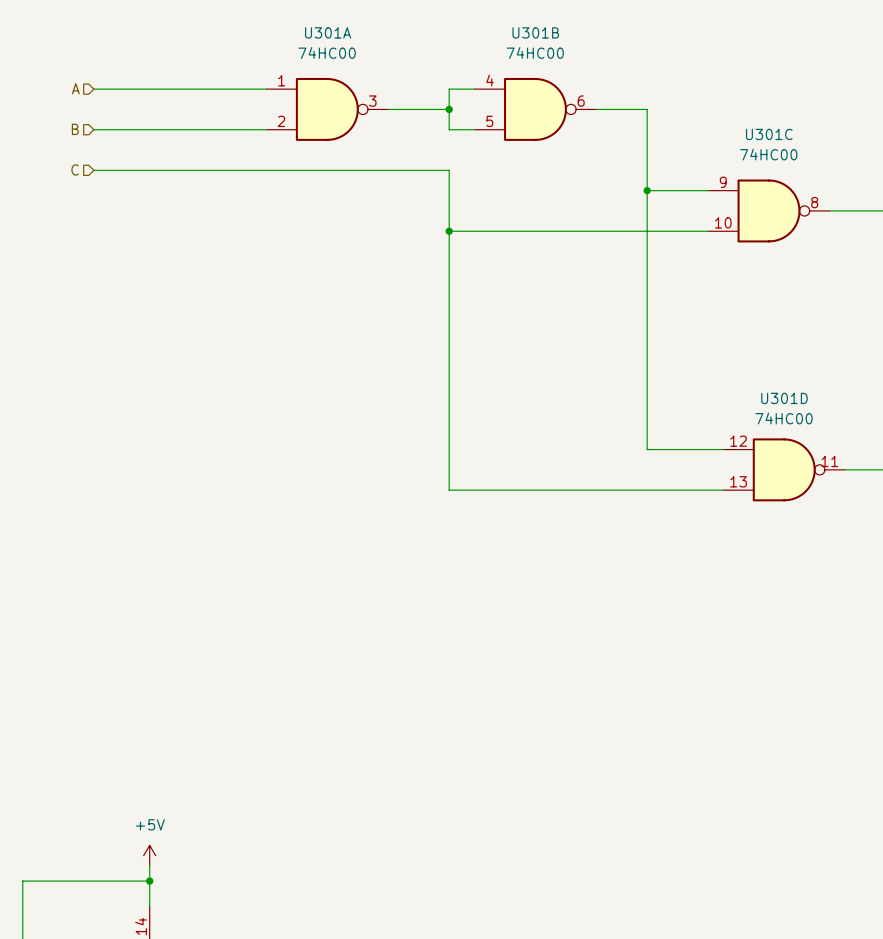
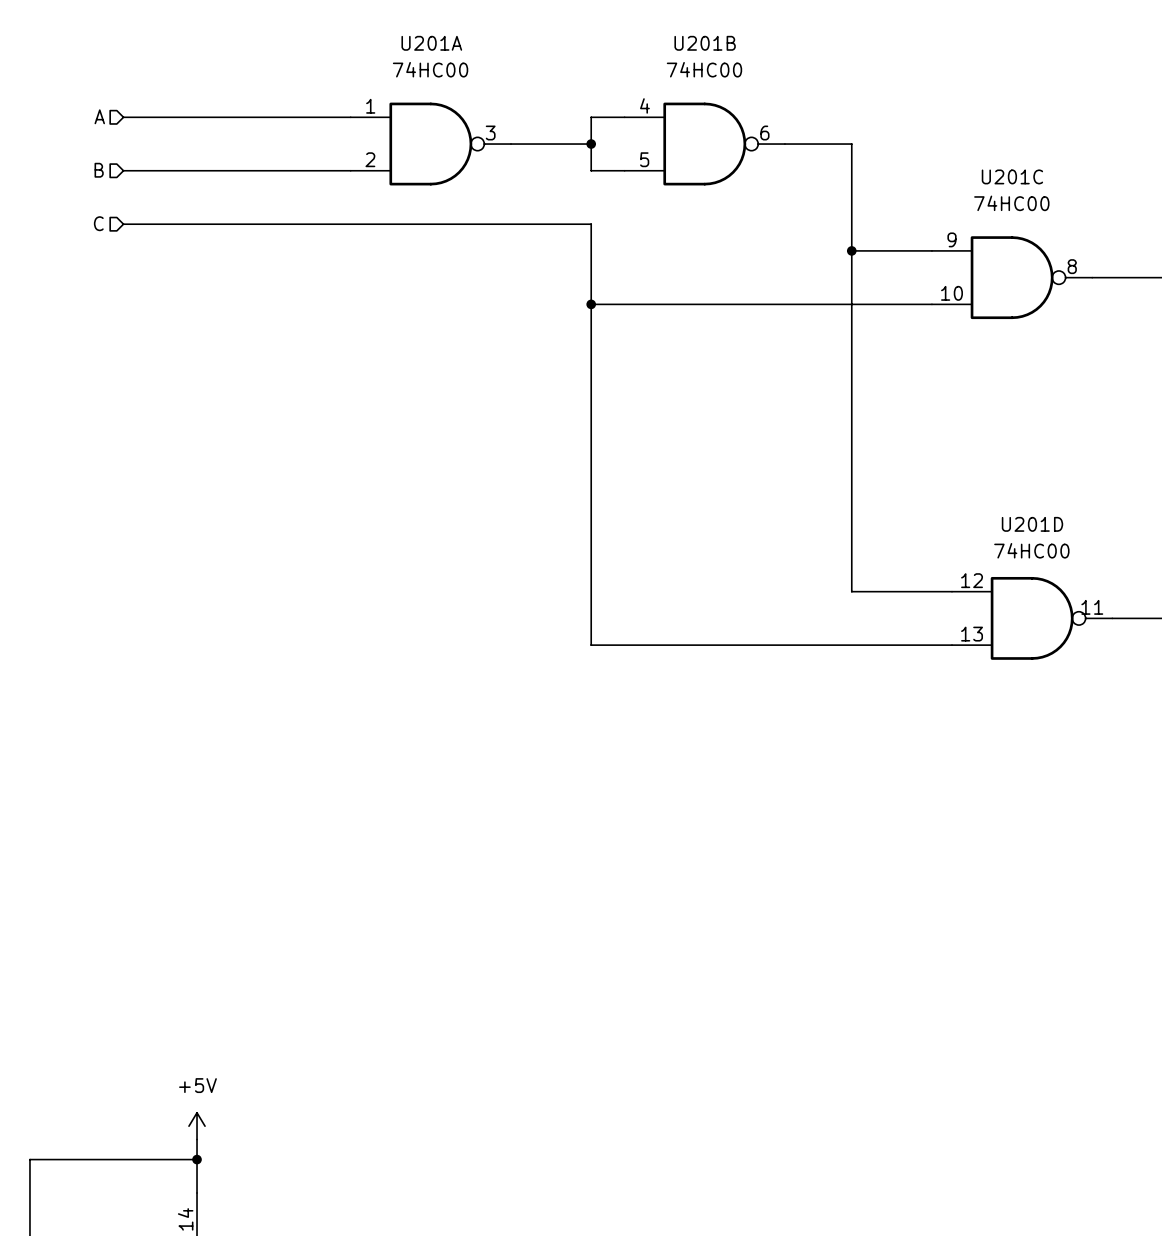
U301A name: U301A (328, 32) -> U201A (431, 43)
U301B name: U301B (535, 32) -> U201B (705, 43)
U301C name: U301C (769, 134) -> U201C (1012, 176)
U301D name: U301D (784, 398) -> U201D (1032, 524)

